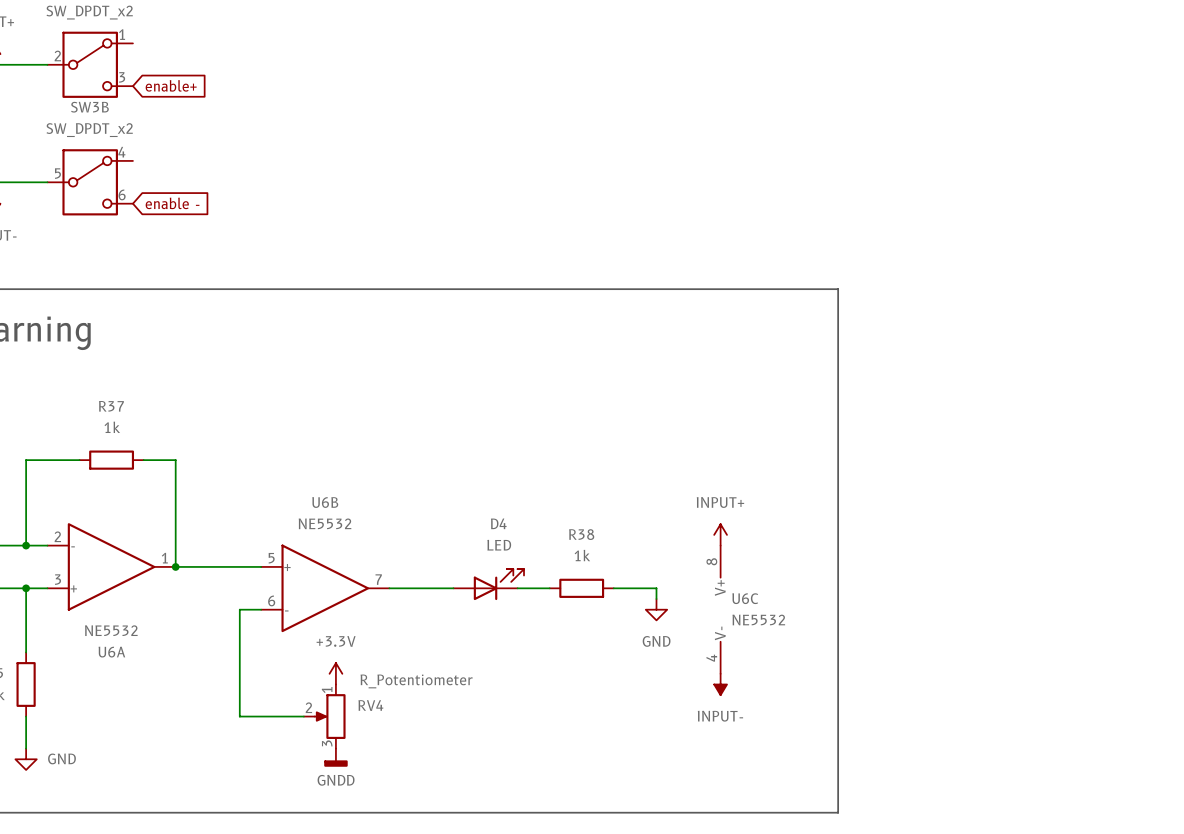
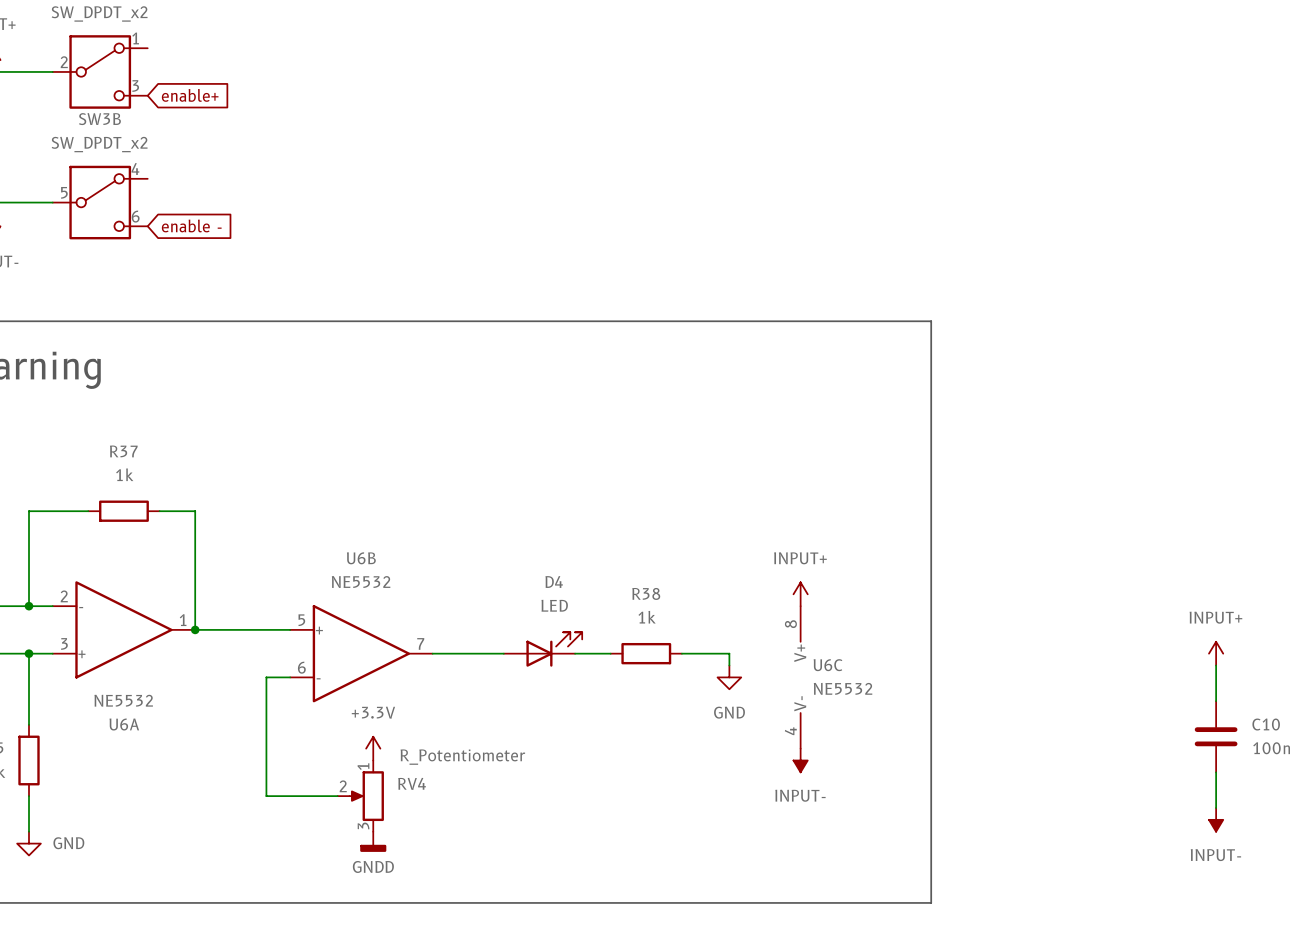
power symbol: none -> INPUT+ (1216, 653)
wire: none -> (1216, 665) (1216, 701)
C10: none -> 100n (1216, 736)
wire: none -> (1216, 772) (1216, 807)
power symbol: none -> INPUT- (1216, 819)

